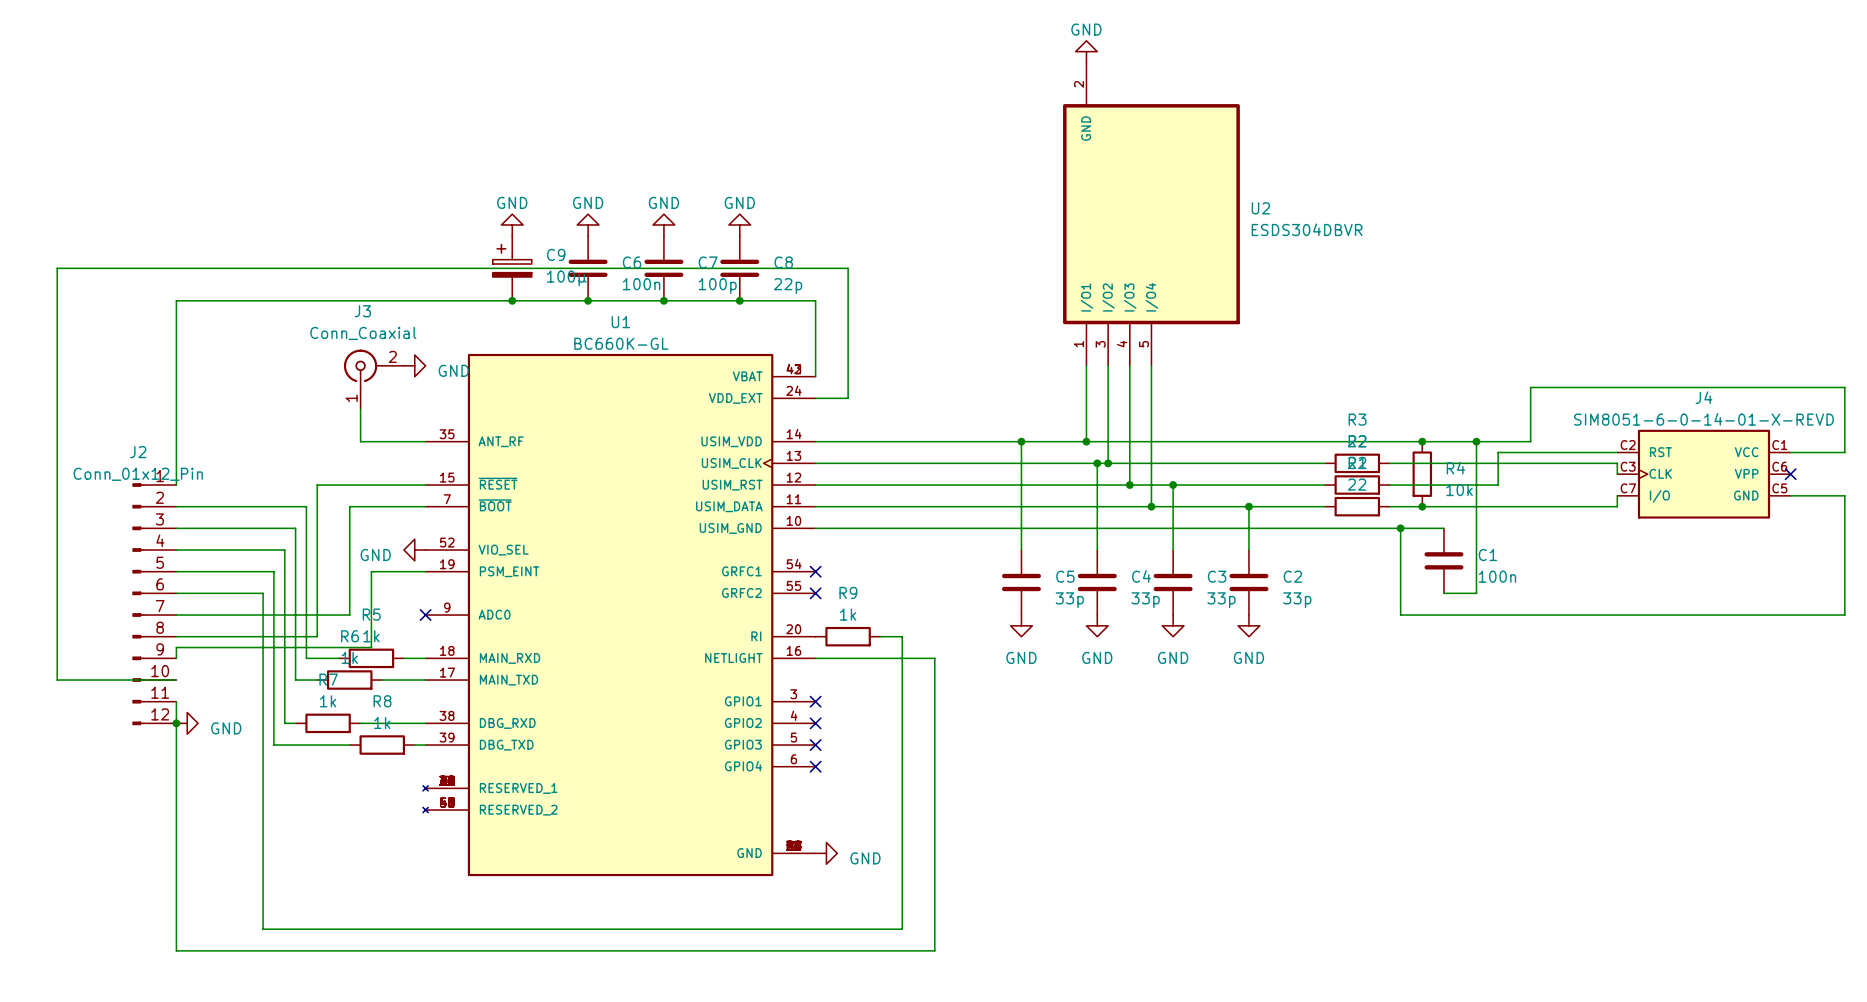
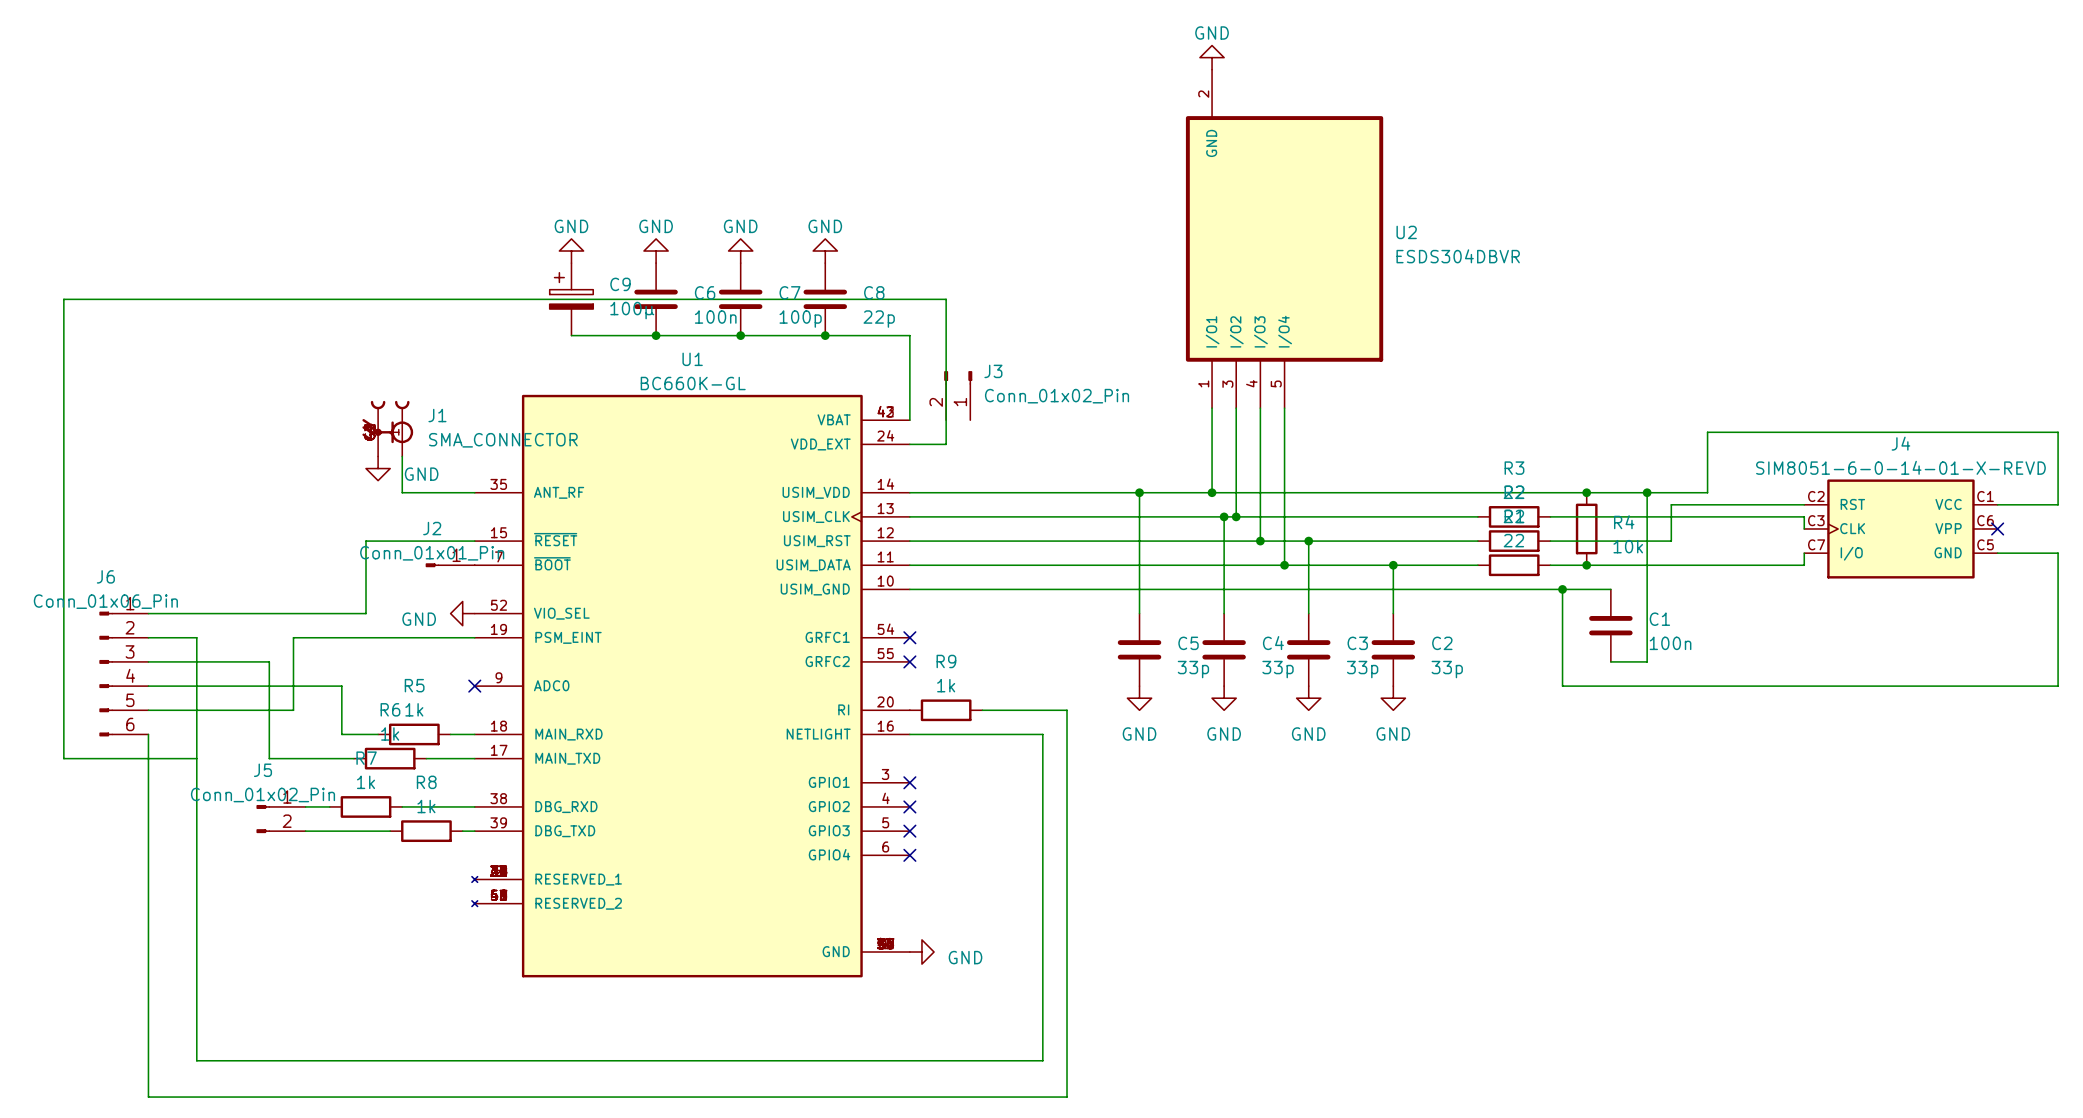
wire: (512, 300) (176, 300) (176, 485) -> none
junction: (512, 300) -> none
J3 name position: J3 (362, 311) -> J3 (993, 371)
J3 value: Conn_Coaxial (363, 333) -> Conn_01x02_Pin (1057, 396)
J3 symbol: [343, 349, 404, 410] -> [944, 371, 973, 421]
power symbol rotation: 0° (414, 365) -> 90° clockwise (378, 468)
power symbol position: GND (414, 365) -> GND (378, 468)
J1: none -> SMA_CONNECTOR (387, 428)
J2 name position: J2 (138, 452) -> J2 (432, 528)
J2 value: Conn_01x12_Pin (138, 474) -> Conn_01x01_Pin (432, 553)
J2 symbol: [132, 483, 177, 726] -> [425, 563, 475, 568]
wire: (328, 485) (317, 485) (317, 636) (263, 636) (263, 929) (902, 929) (902, 636) -> (148, 734) (148, 1097) (1067, 1097) (1067, 710) (1006, 710)
wire: none -> (366, 541) (366, 613) (317, 613)
wire: (176, 506) (306, 506) (306, 615) (349, 615) (349, 506) (425, 506) -> none
wire: (176, 528) (295, 528) (295, 680) -> (269, 661) (269, 758) (329, 758)
wire: (284, 550) (284, 723) -> (305, 806) (317, 806)
wire: none -> (148, 637) (196, 637) (196, 722)
wire: (176, 571) (263, 571) -> none
wire: (273, 571) (273, 745) -> none
wire: (371, 571) (371, 647) (176, 647) -> (414, 637) (305, 637)
wire: (241, 593) (263, 593) -> (293, 637) (293, 661)
J6: none -> Conn_01x06_Pin (123, 674)
wire: none -> (196, 734) (196, 782)
junction: (176, 723) -> none
power symbol: GND (187, 723) -> none
J5: none -> Conn_01x02_Pin (281, 819)

